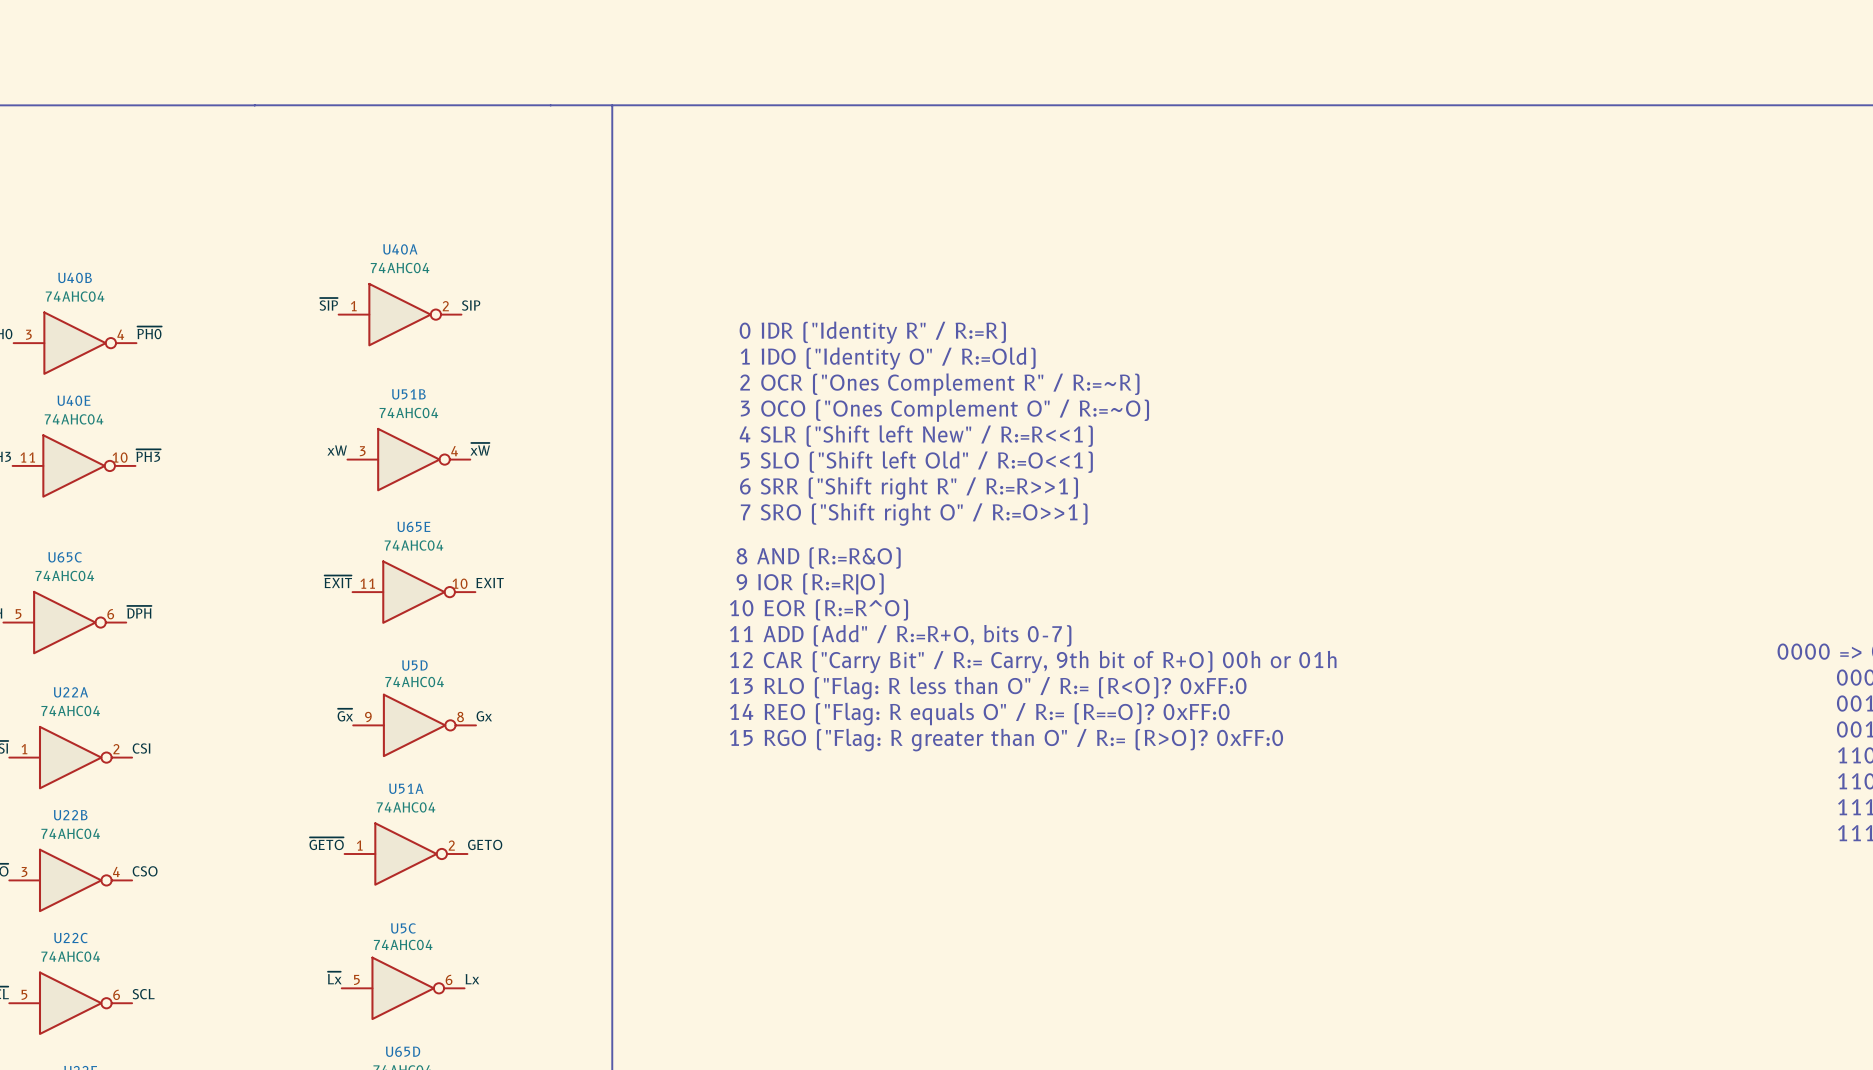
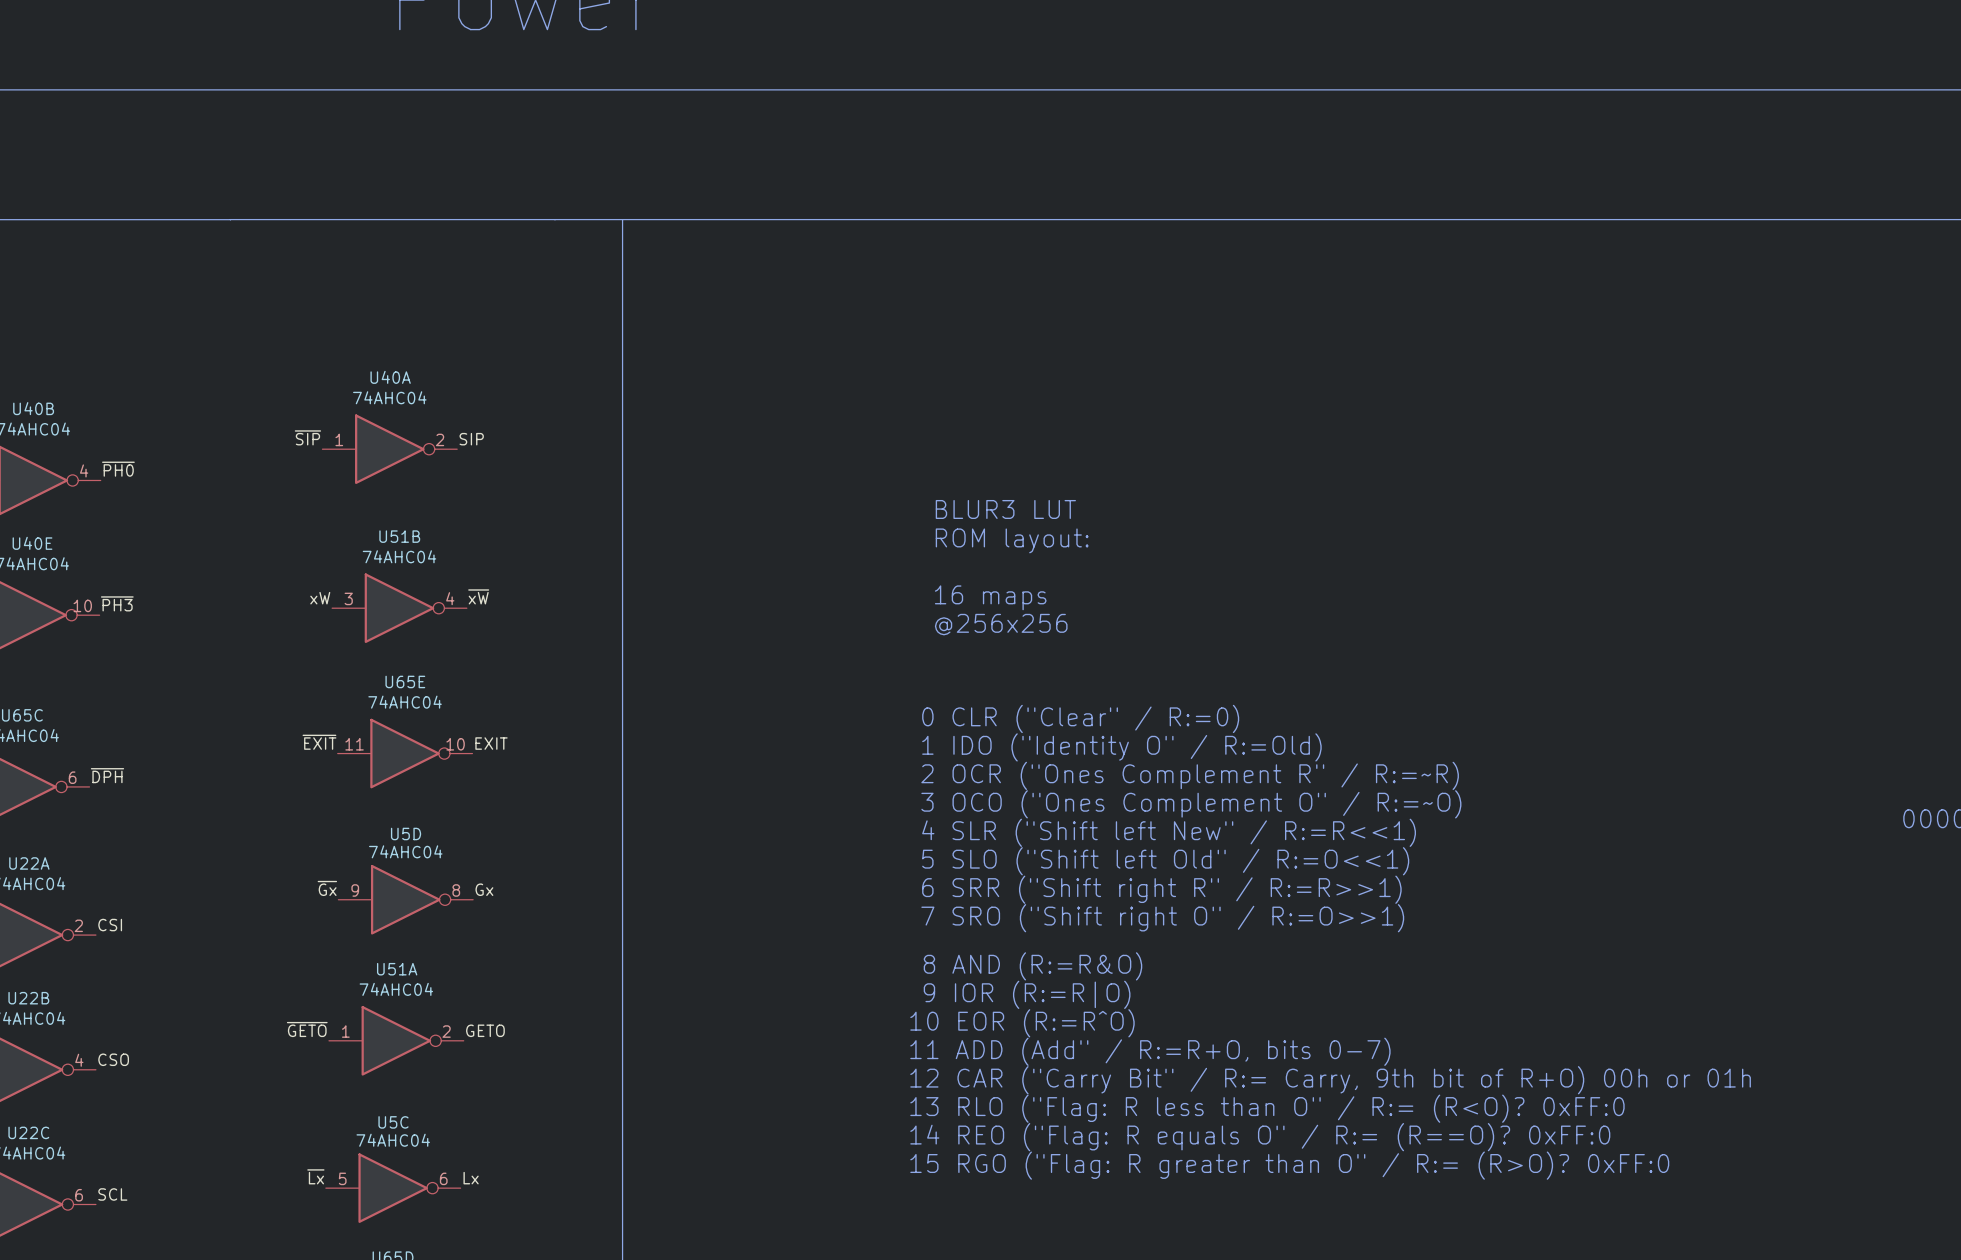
text: 0 IDR ("Identity R" / R:=R) (872, 332) -> none
text: 1 IDO ("Identity O" / R:=Old) (888, 358) -> none
text: none -> BLUR3 LUT (1005, 509)
text: 2 OCR ("Ones Complement R" / R:=~R) (939, 384) -> none
text: none -> ROM layout: (1012, 540)
text: 3 OCO ("Ones Complement O" / R:=~O) (944, 410) -> none
text: 4 SLR ("Shift left New" / R:=R<<1) (916, 436) -> none
text: none -> 16 maps (990, 597)
text: 5 SLO ("Shift left Old" / R:=O<<1) (916, 462) -> none
text: none -> @256x256 (1001, 624)
text: 6 SRR ("Shift right R" / R:=R>>1) (909, 488) -> none
text: 7 SRO ("Shift right O" / R:=O>>1) (914, 514) -> none
text: 8 AND (R:=R&O) (818, 558) -> none
text: none -> 0 CLR ("Clear" / R:=0) (1080, 718)
text: 9 IOR (R:=R|O) (810, 583) -> none
text: none -> 1 IDO ("Identity O" / R:=Old) (1121, 747)
text: 10 EOR (R:=R^O) (819, 609) -> none
text: none -> 2 OCR ("Ones Complement R" / R:=~R) (1190, 775)
text: 11 ADD (Add" / R:=R+O, bits 0-7) (900, 635) -> none
text: none -> 3 OCO ("Ones Complement O" / R:=~O) (1191, 804)
text: 12 CAR ("Carry Bit" / R:= Carry, 9th bit of R+O) 00h or 01h (1033, 662) -> none
text: none -> 4 SLR ("Shift left New" / R:=R<<1) (1169, 832)
text: 13 RLO ("Flag: R less than O" / R:= (R<O)? 0xFF:0 (988, 688) -> none
text: none -> 5 SLO ("Shift left Old" / R:=O<<1) (1165, 861)
text: 14 REO ("Flag: R equals O" / R:= (R==O)? 0xFF:0 (979, 714) -> none
text: none -> 6 SRR ("Shift right R" / R:=R>>1) (1161, 889)
text: 15 RGO ("Flag: R greater than O" / R:= (R>O)? 0xFF:0 (1006, 740) -> none
text: none -> 7 SRO ("Shift right O" / R:=O>>1) (1162, 918)
text: none -> 8 AND (R:=R&O) (1032, 966)
text: none -> 9 IOR (R:=R|O) (1027, 994)
text: none -> 10 EOR (R:=R^O) (1022, 1023)
text: none -> 11 ADD (Add" / R:=R+O, bits 0-7) (1150, 1051)
text: none -> 12 CAR ("Carry Bit" / R:= Carry, 9th bit of R+O) 00h or 01h (1330, 1080)
text: none -> 13 RLO ("Flag: R less than O" / R:= (R<O)? 0xFF:0 (1267, 1108)
text: none -> 14 REO ("Flag: R equals O" / R:= (R==O)? 0xFF:0 (1260, 1137)
text: none -> 15 RGO ("Flag: R greater than O" / R:= (R>O)? 0xFF:0 (1289, 1165)

